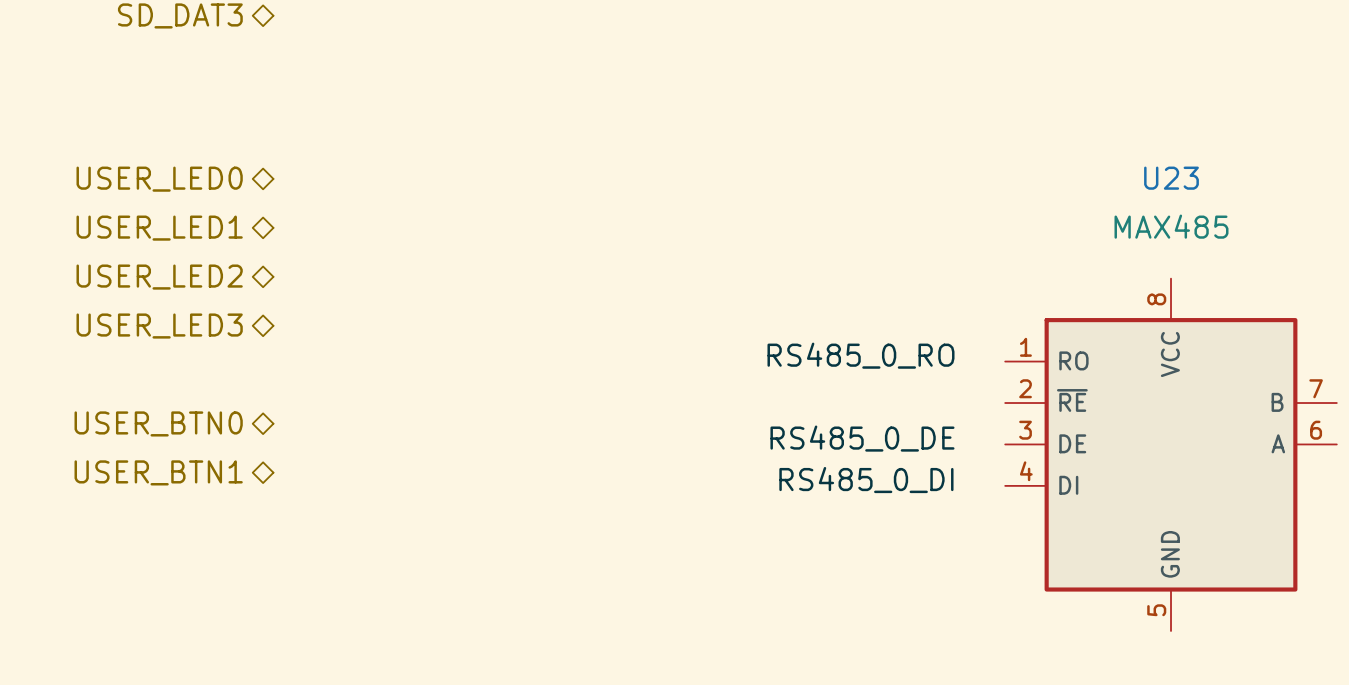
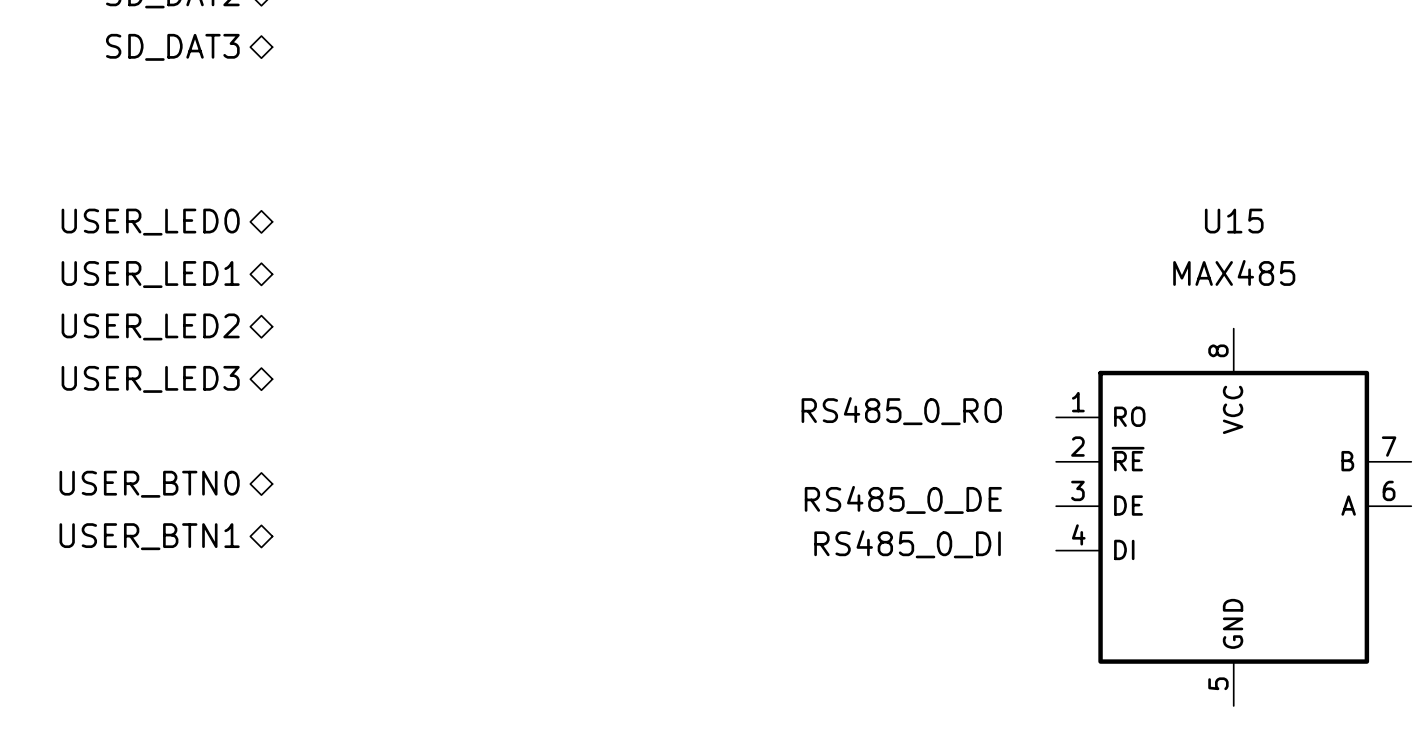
U23 name: U23 (1171, 178) -> U15 (1234, 221)

